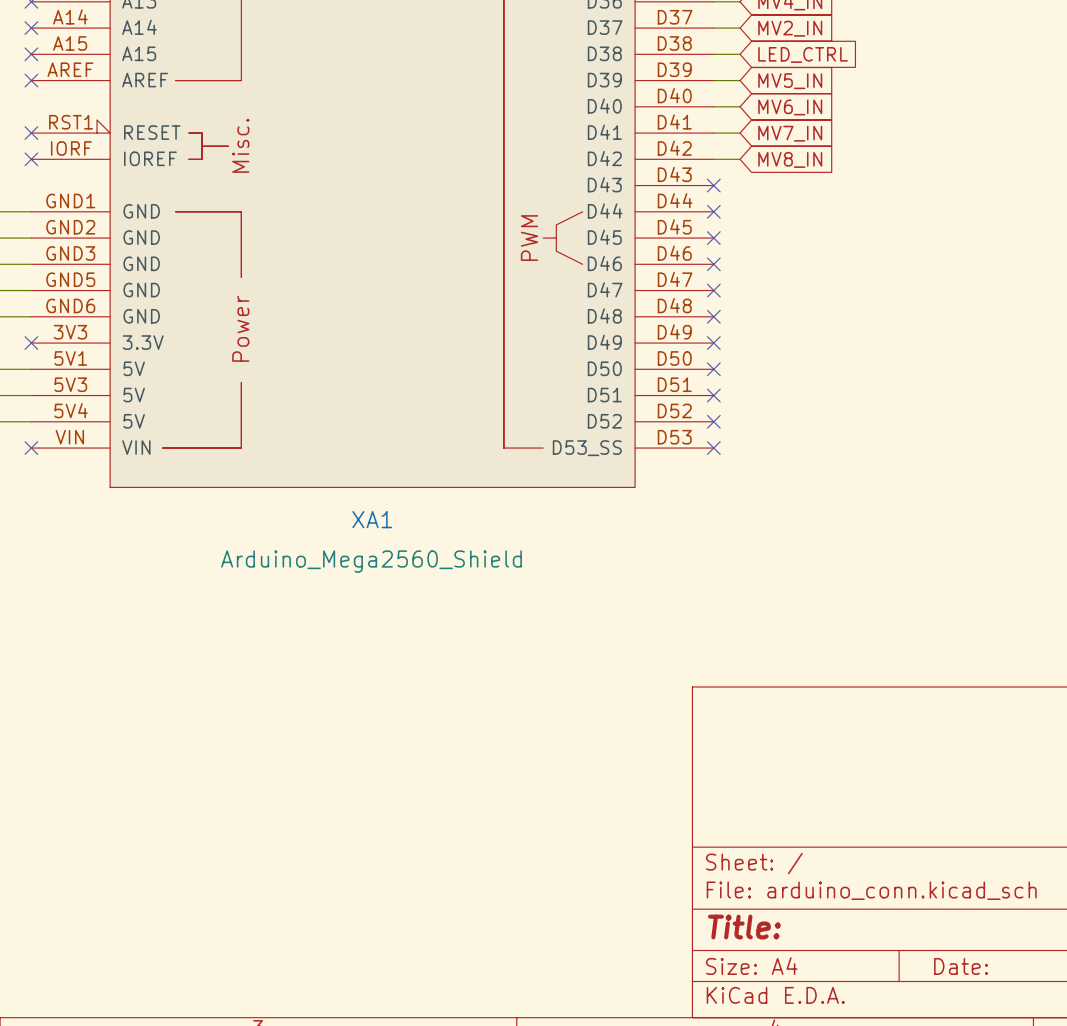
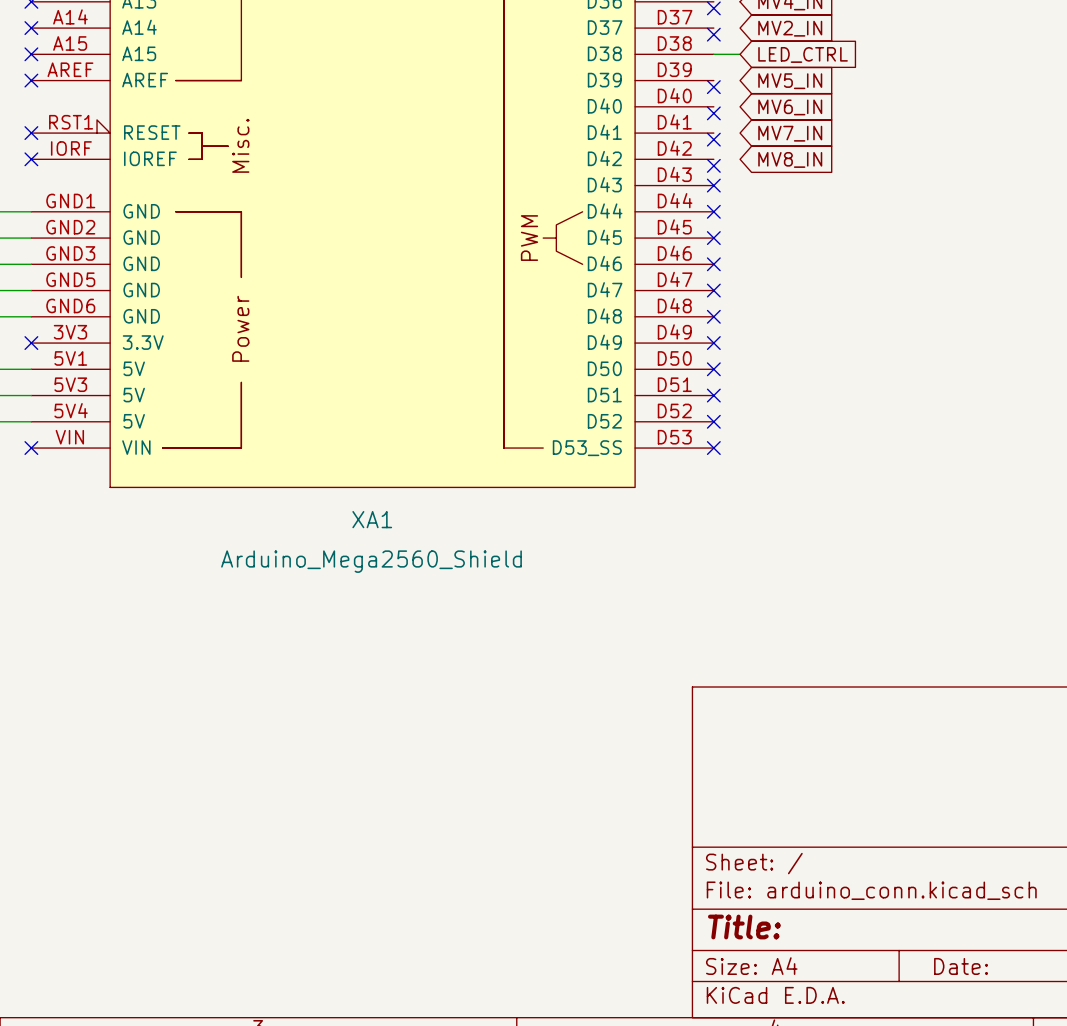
wire: (713, 1) (740, 1) -> none
no-connect mark: none -> (713, 8)
wire: (713, 28) (740, 28) -> none
no-connect mark: none -> (713, 34)
wire: (713, 80) (740, 80) -> none
no-connect mark: none -> (713, 87)
wire: (713, 106) (740, 106) -> none
no-connect mark: none -> (713, 113)
wire: (713, 133) (740, 133) -> none
no-connect mark: none -> (713, 139)
wire: (713, 159) (740, 159) -> none
no-connect mark: none -> (713, 165)

